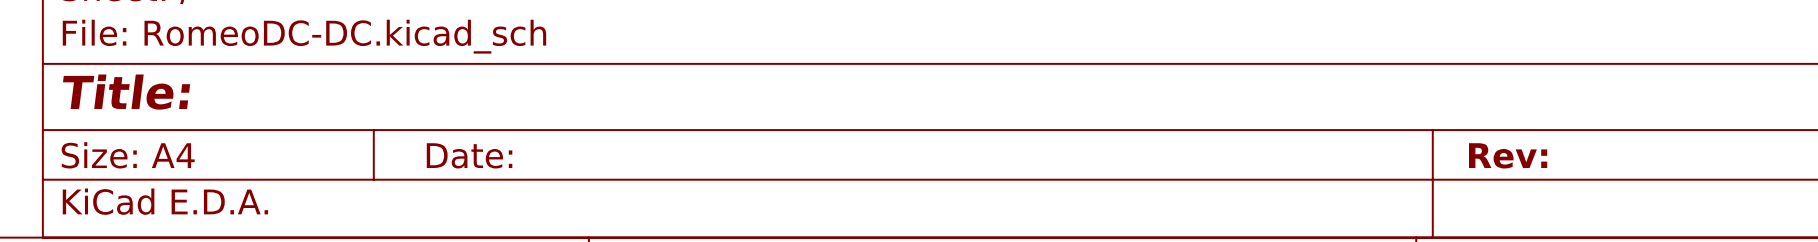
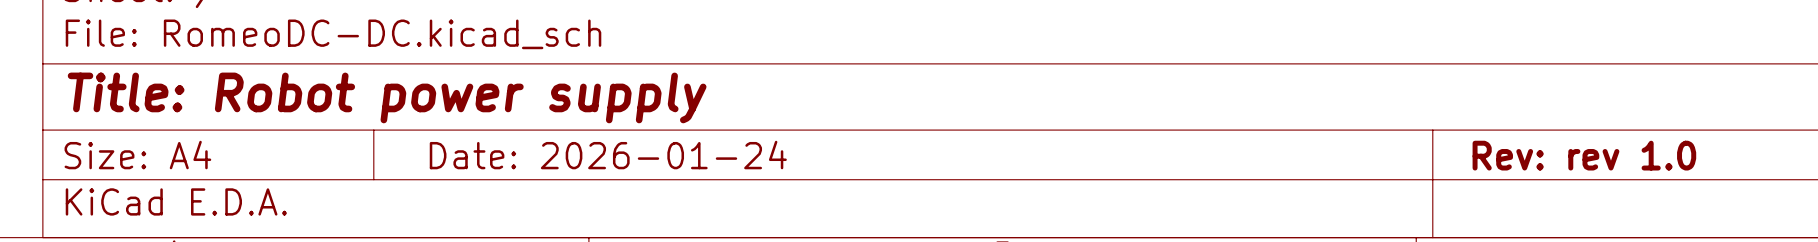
title block: Title: (126, 92) -> Title: Robot power supply (387, 97)
title block: Date: (469, 155) -> Date: 2026-01-24 (608, 155)
title block: Rev: (1508, 155) -> Rev: rev 1.0 (1584, 155)

